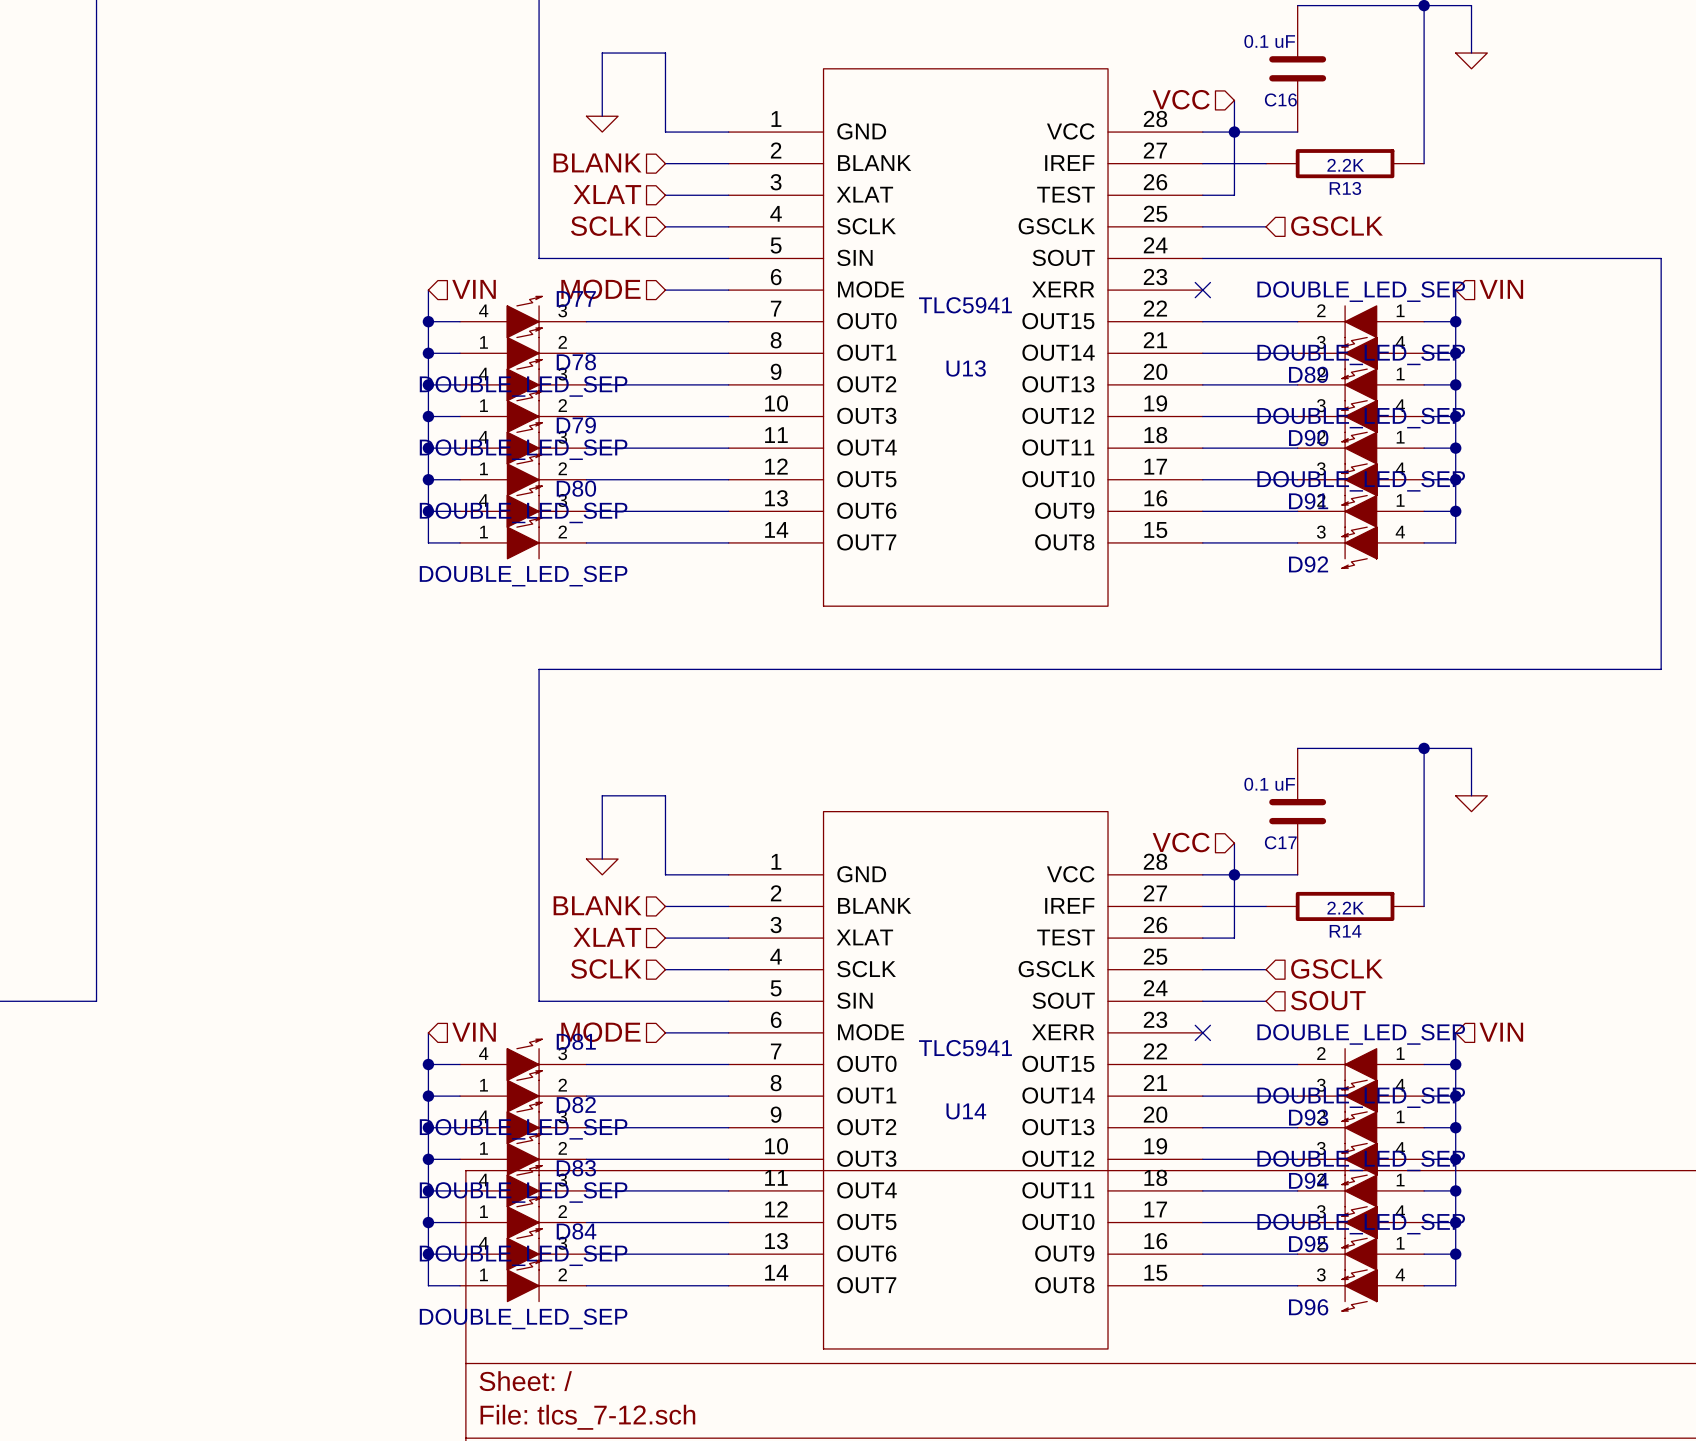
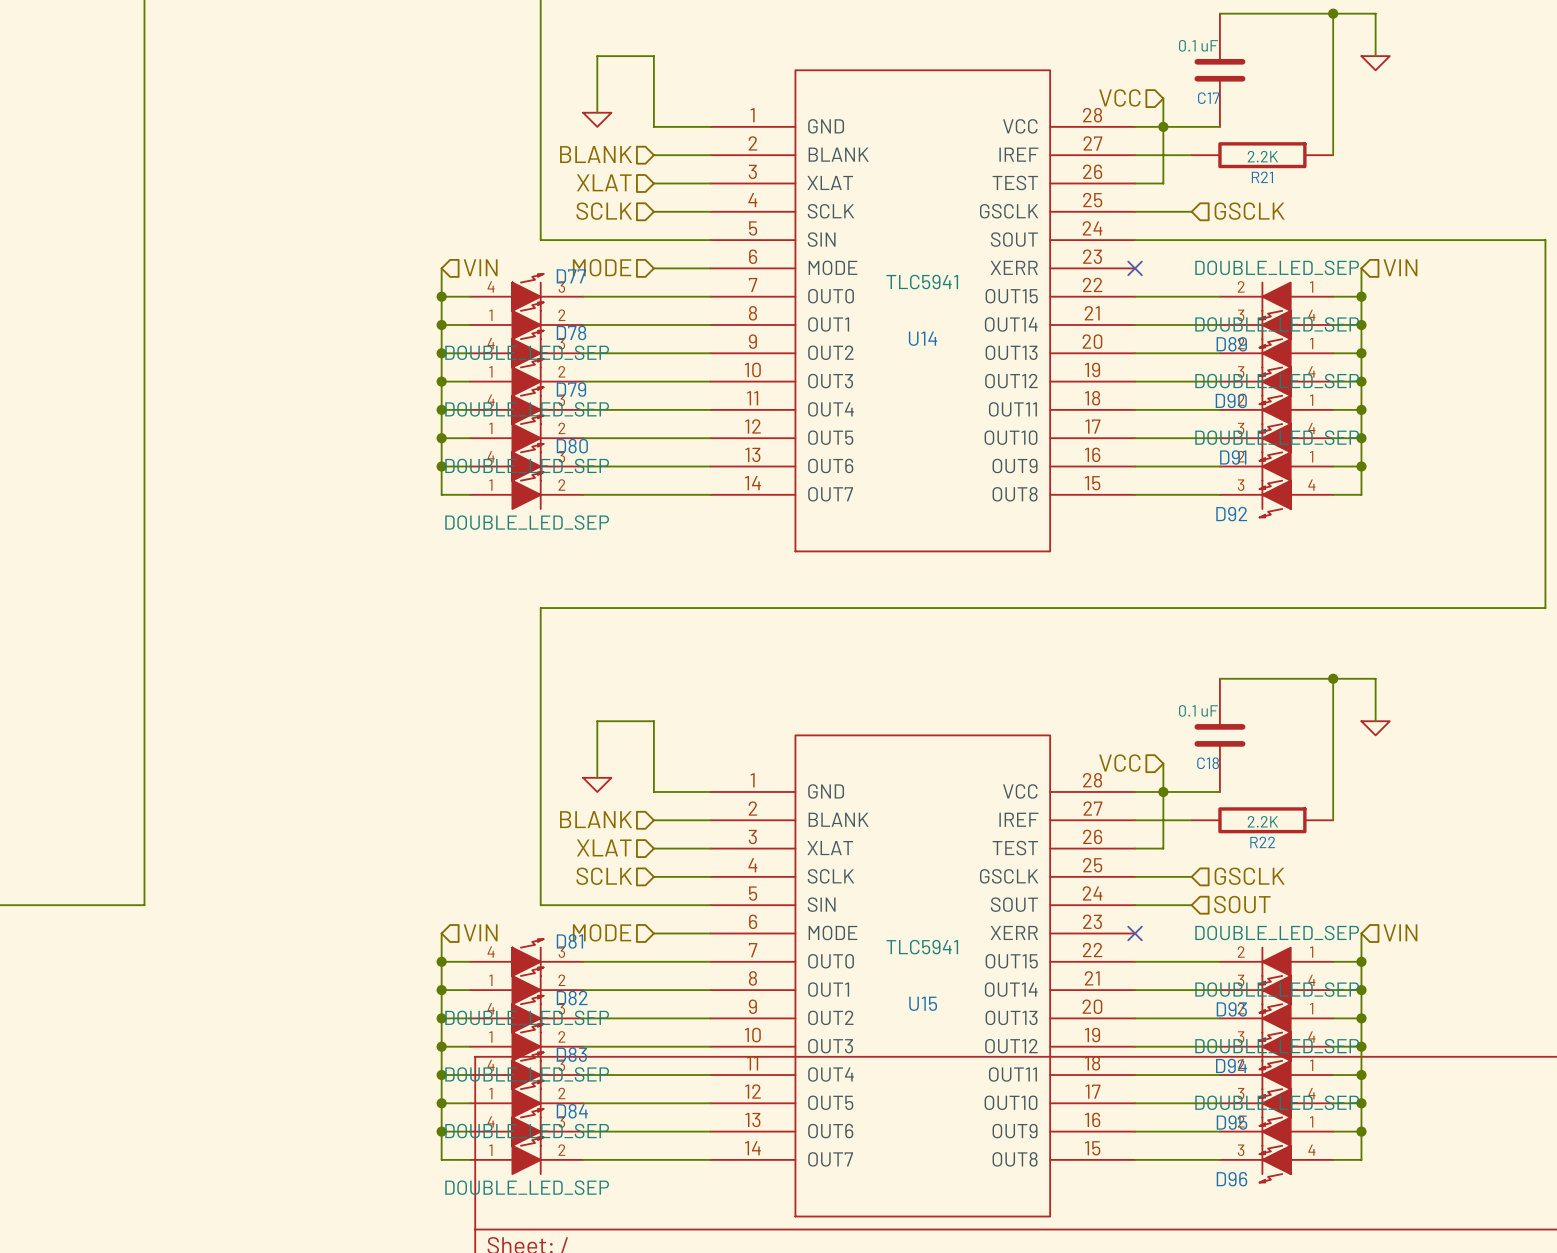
C16 name: C16 (1280, 99) -> C17 (1208, 98)
R13 name: R13 (1345, 188) -> R21 (1262, 177)
U13 name: U13 (966, 368) -> U14 (923, 338)
C17 name: C17 (1280, 842) -> C18 (1208, 763)
R14 name: R14 (1345, 931) -> R22 (1262, 842)
U14 name: U14 (966, 1111) -> U15 (923, 1003)

